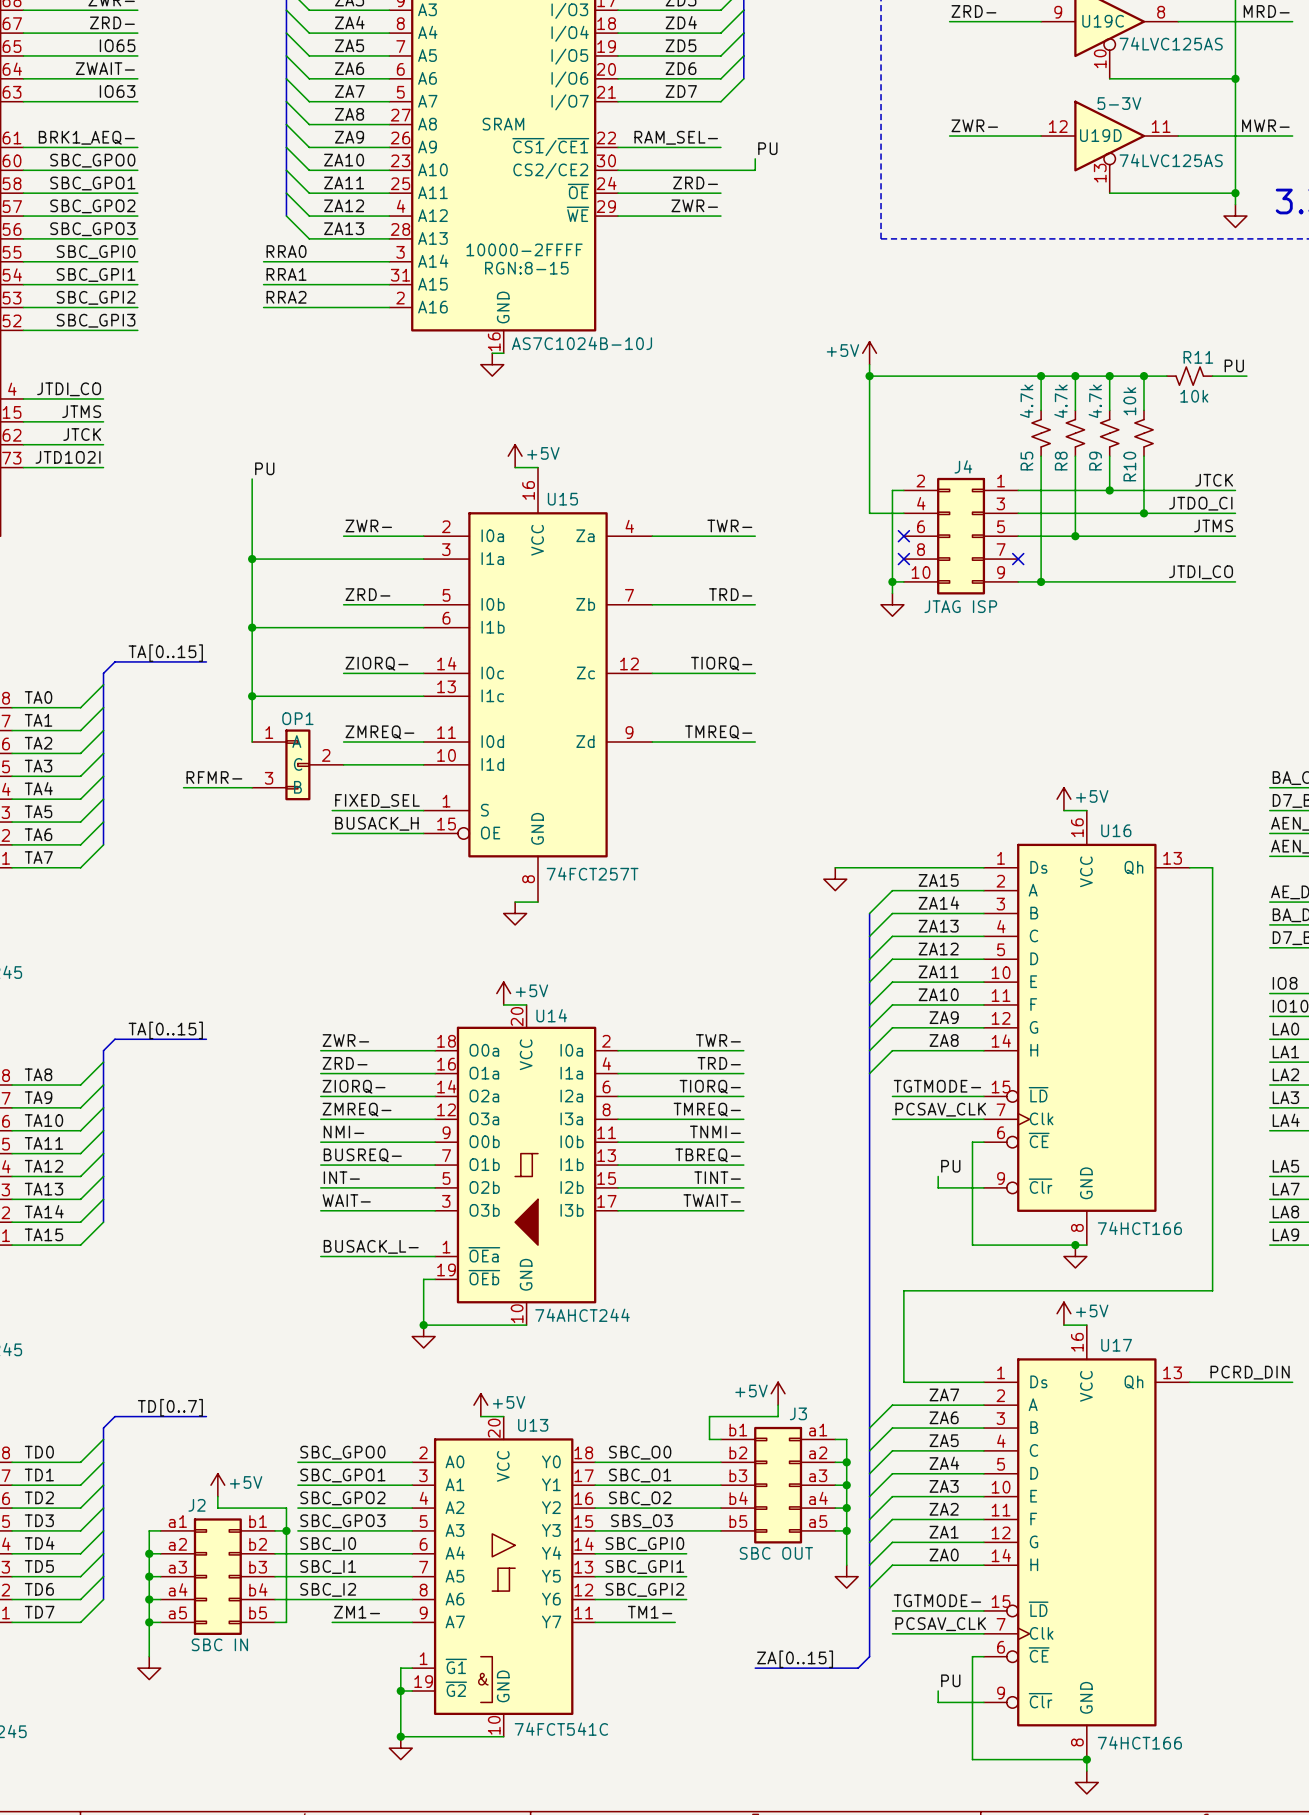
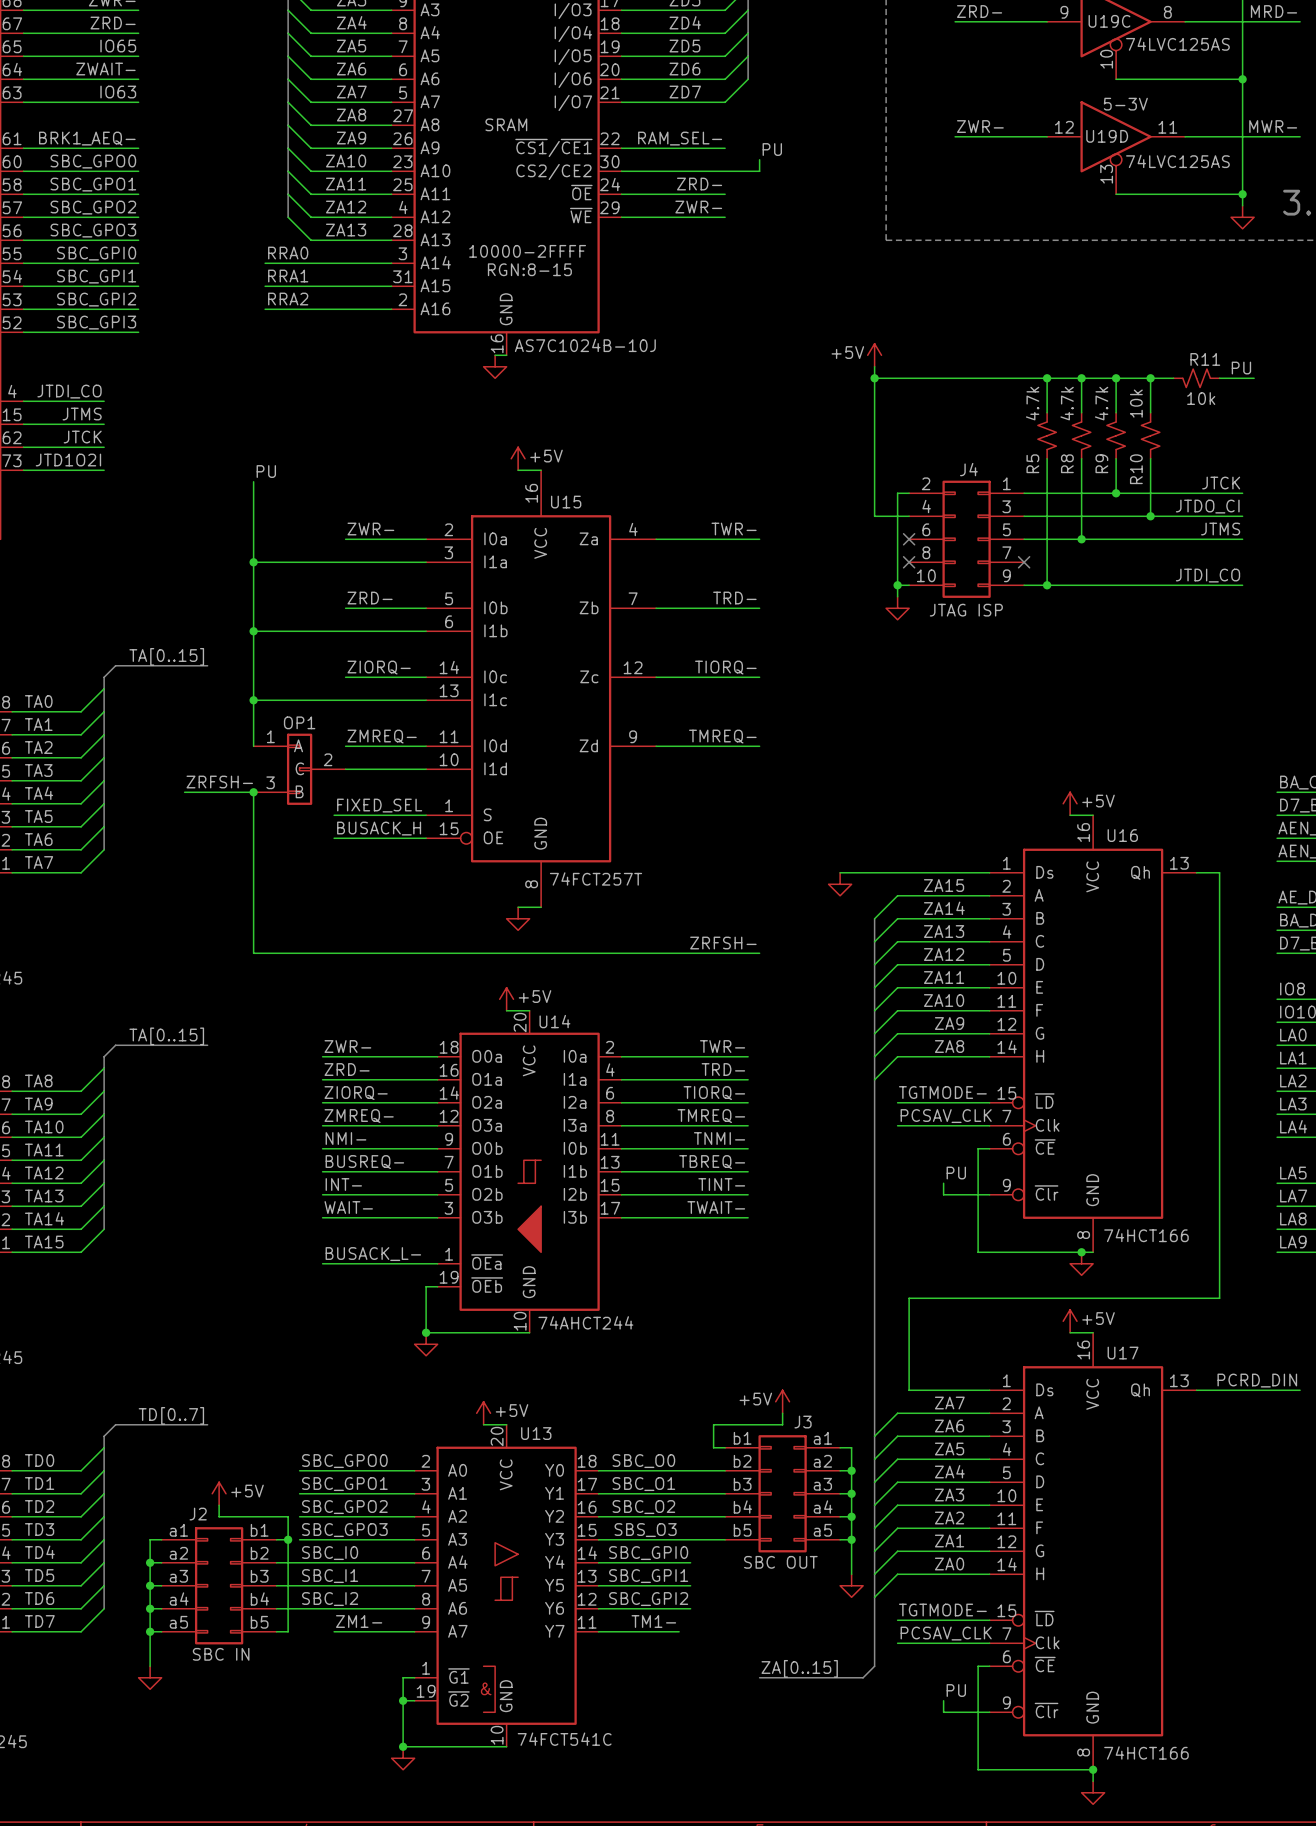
label: RFMR- (214, 777) -> ZRFSH- (219, 782)
wire: none -> (253, 792) (253, 953) (759, 953)
junction: none -> (253, 792)
label: none -> ZRFSH- (723, 943)

